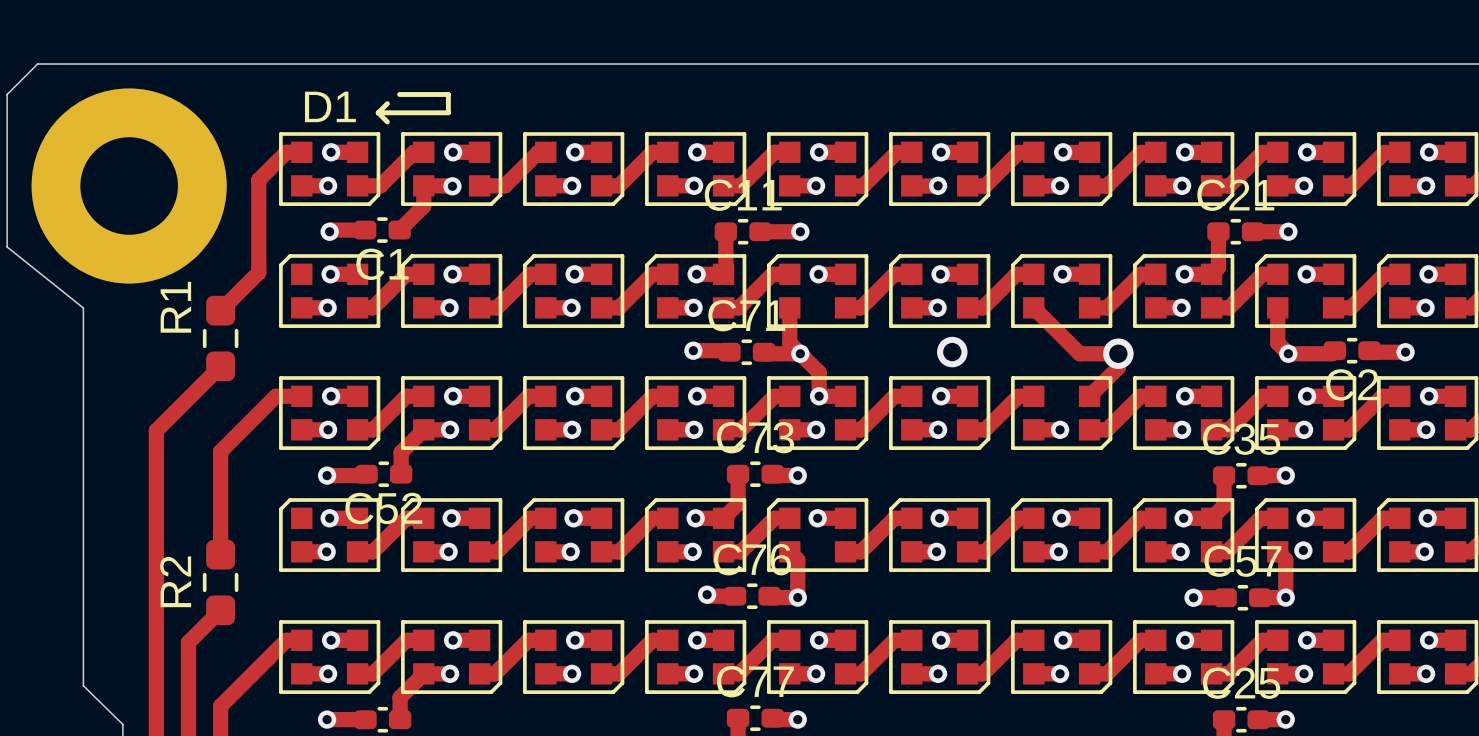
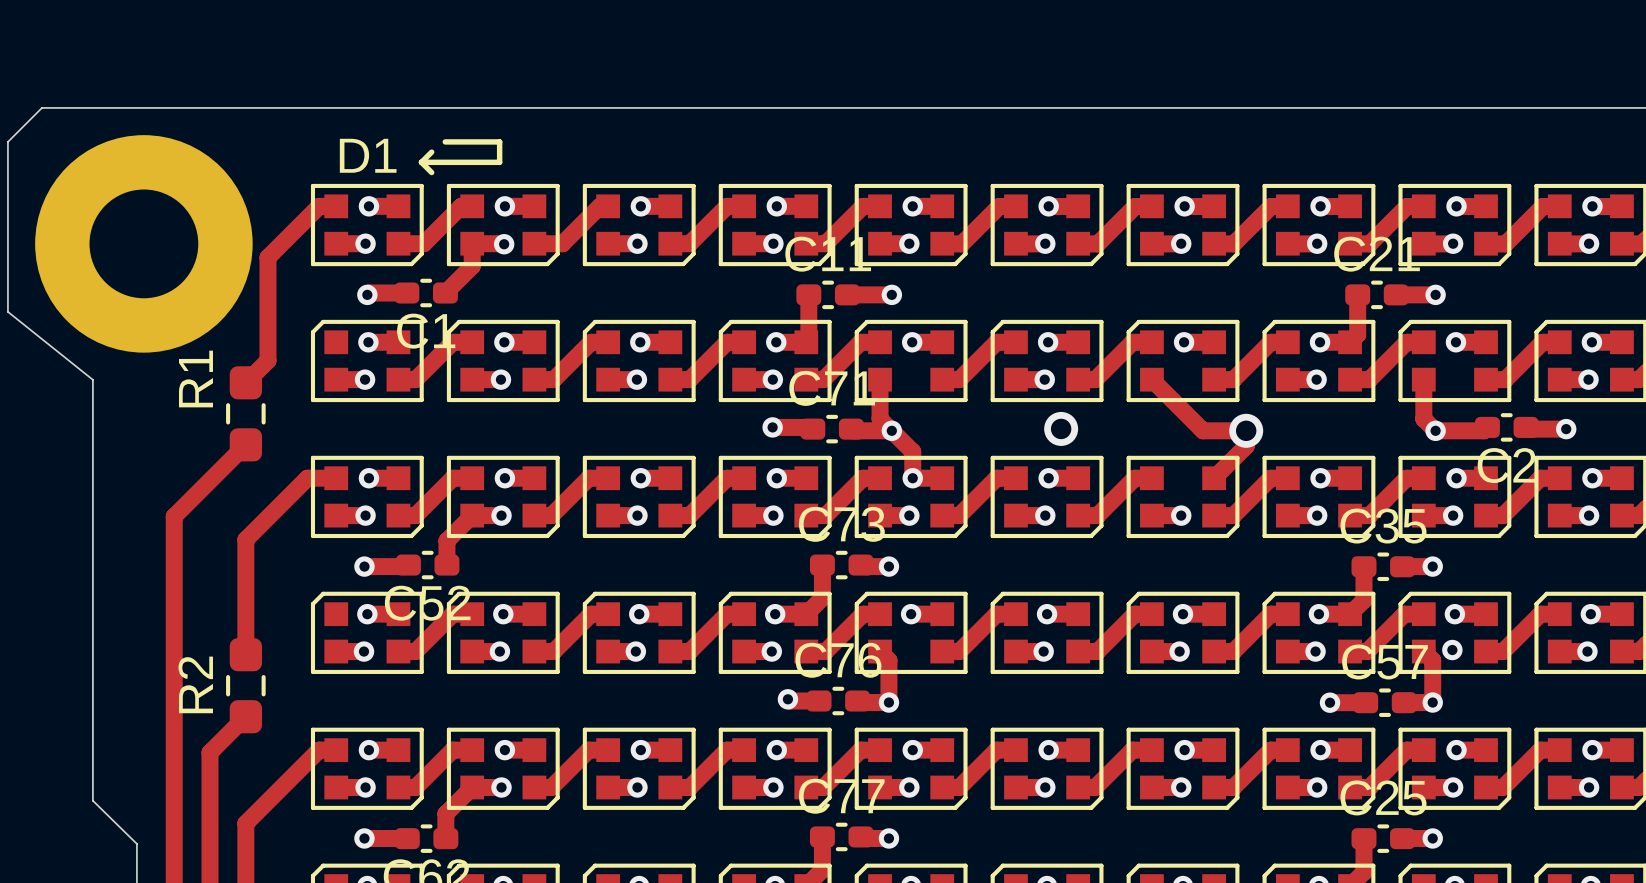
track: (258, 179) (258, 272) (240, 290) -> (288, 237) (267, 257) (267, 360)

